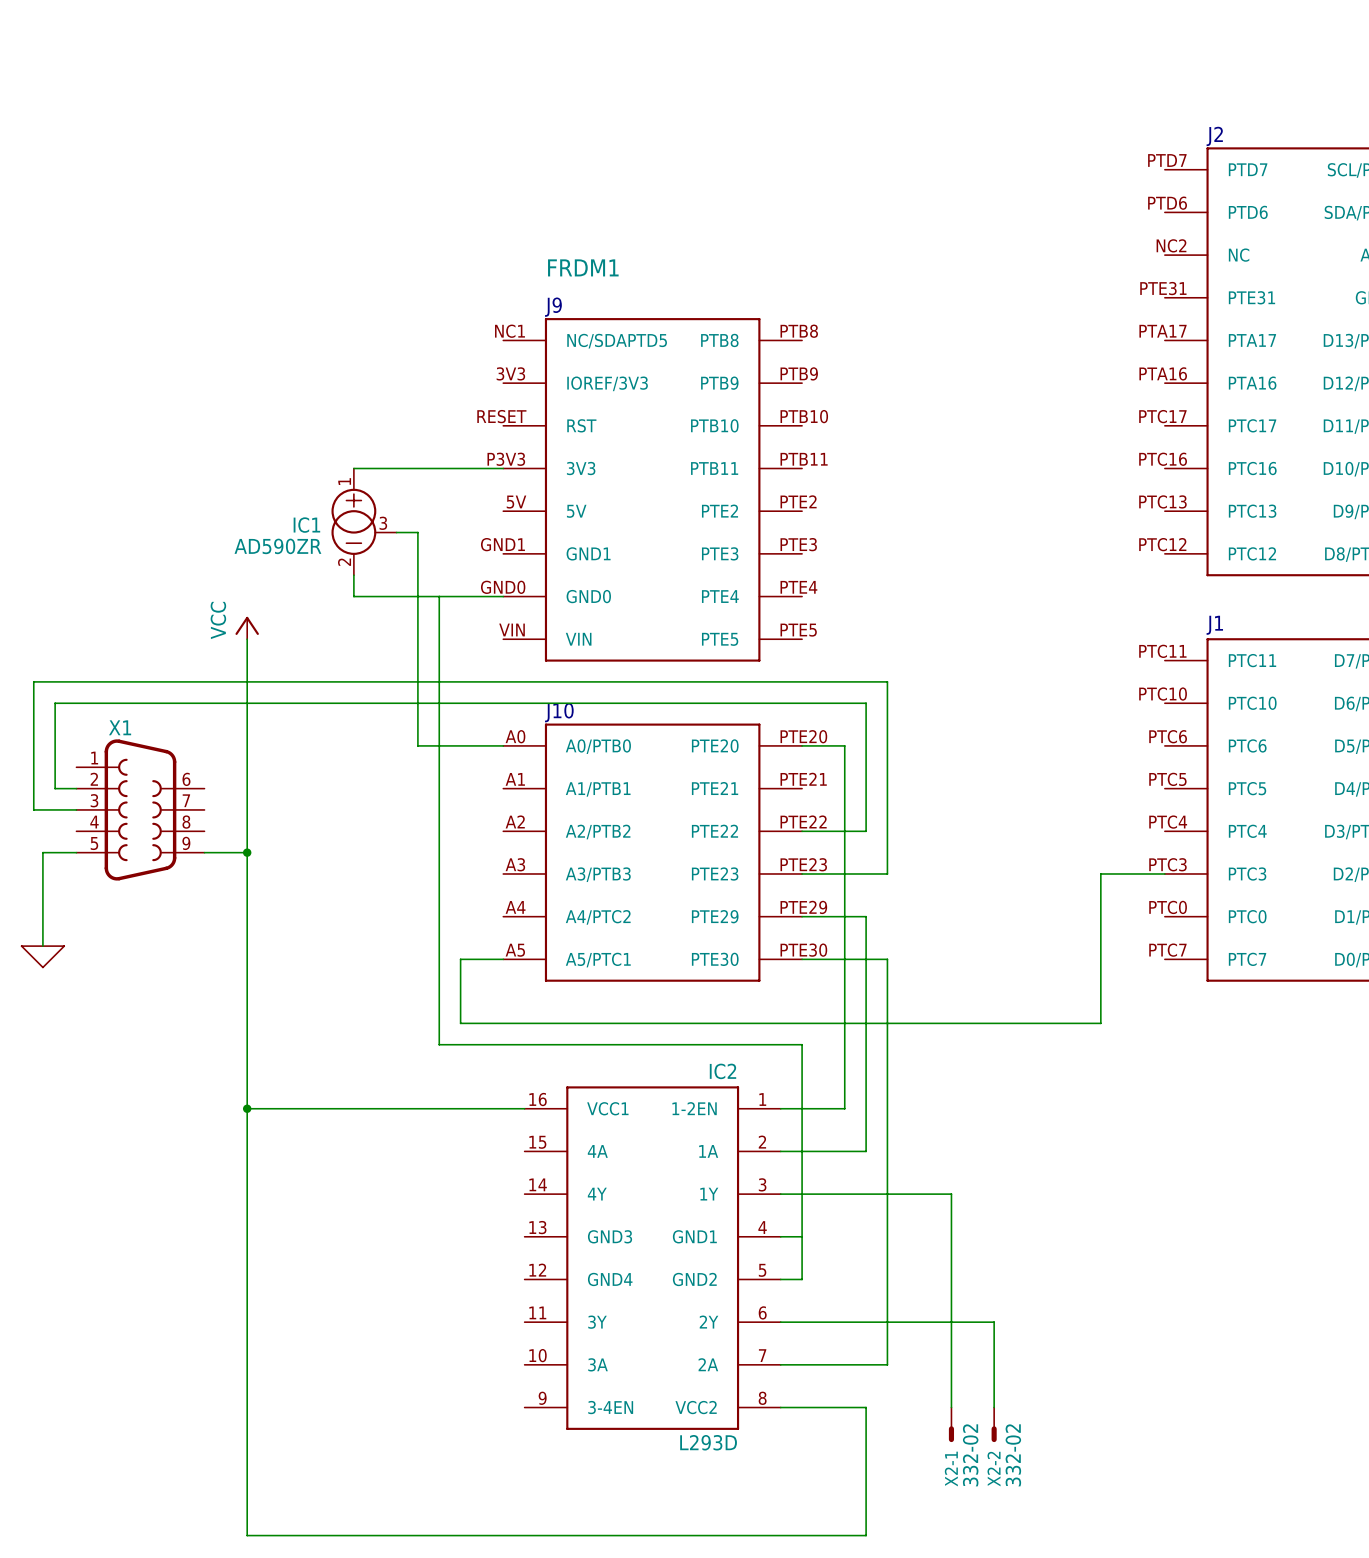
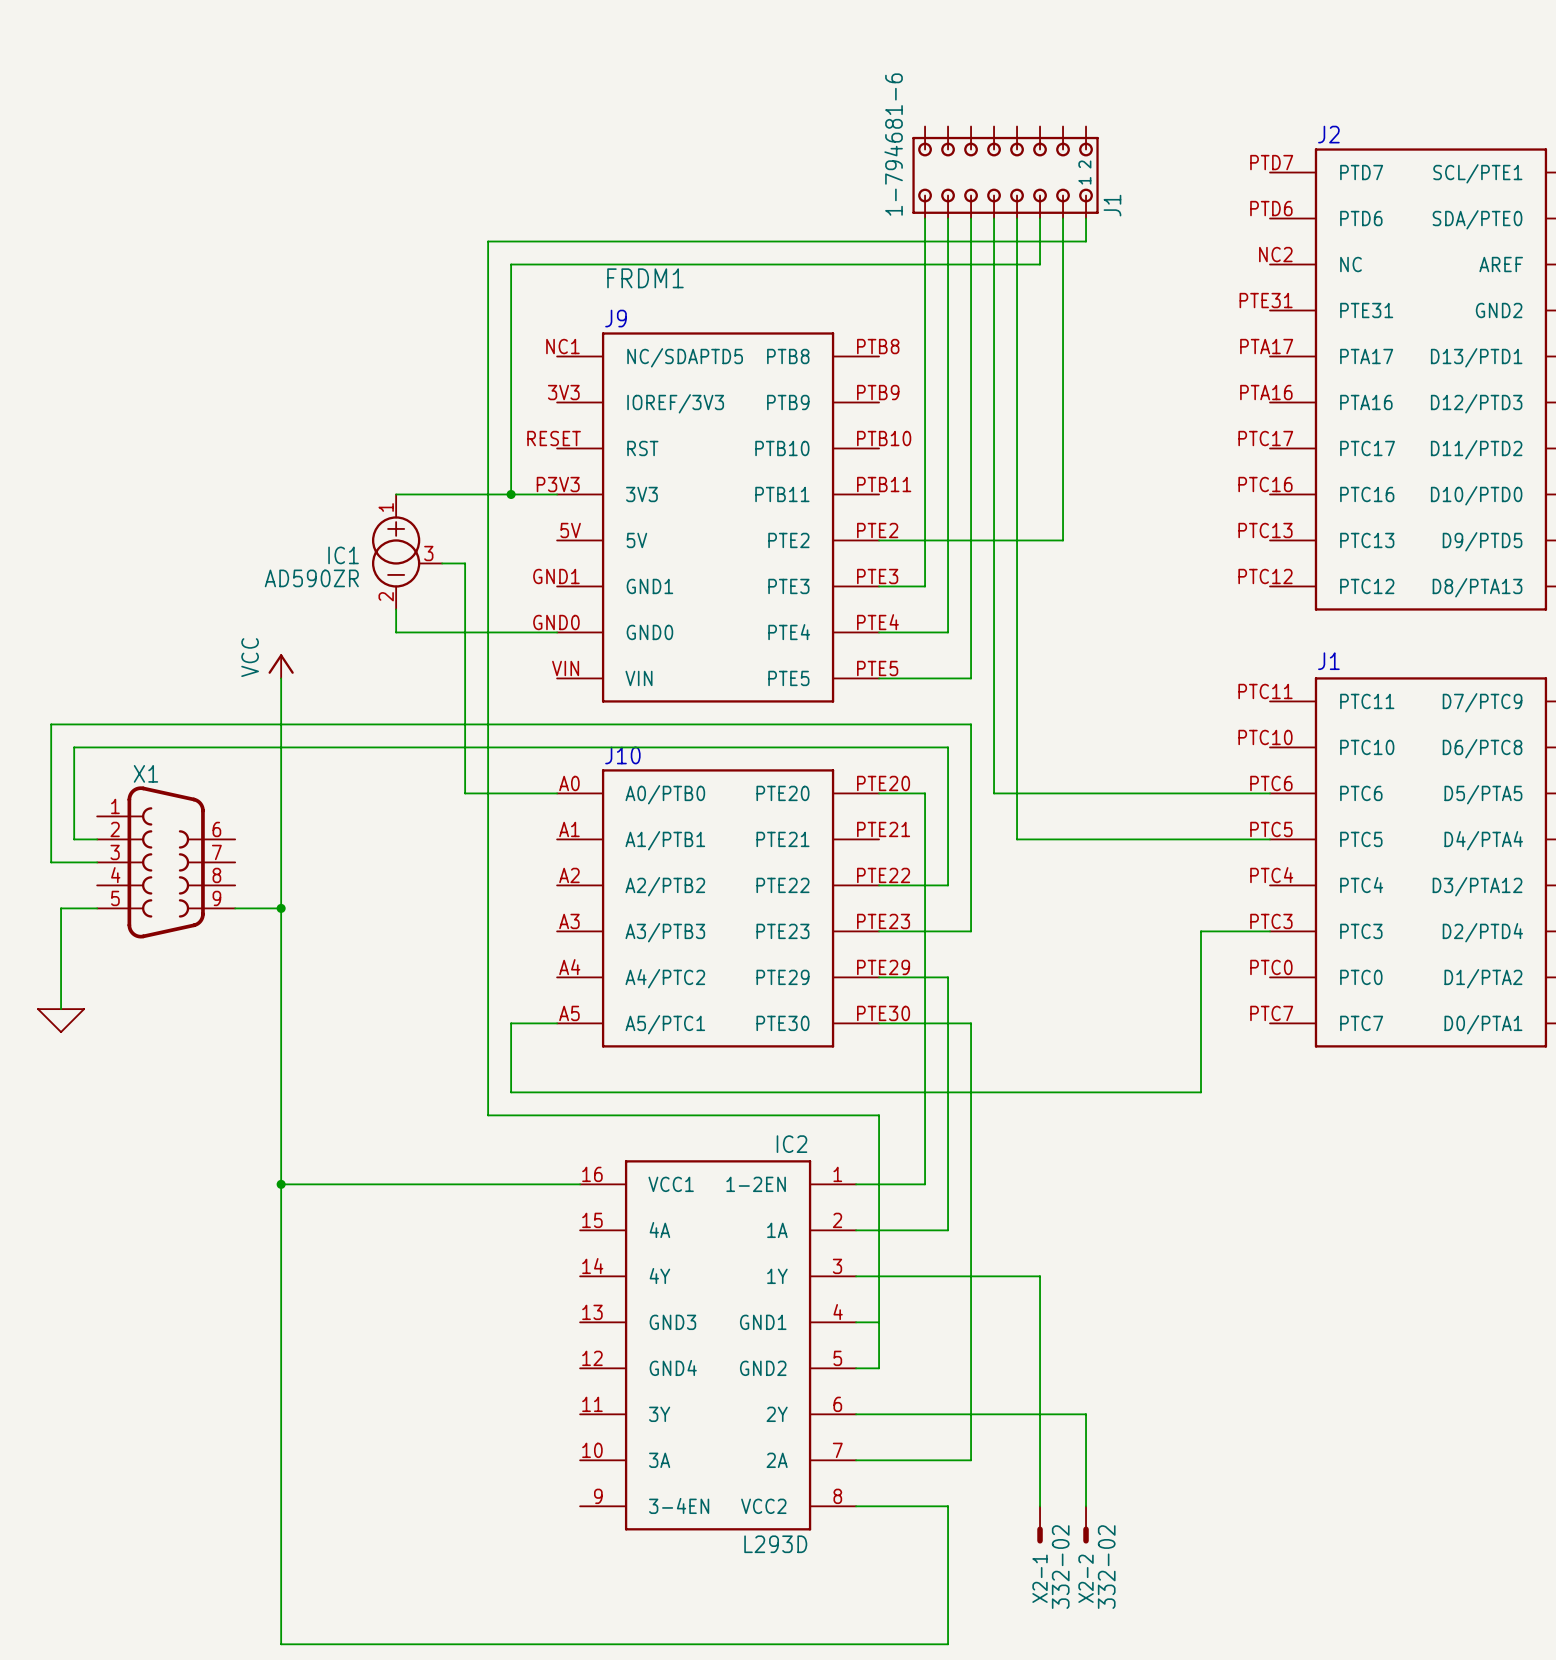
J1: none -> 1-794681-6 (1005, 172)
wire: none -> (925, 218) (925, 586) (879, 586)
wire: none -> (948, 218) (948, 632) (879, 632)
wire: none -> (971, 218) (971, 678) (879, 678)
wire: none -> (994, 218) (994, 793) (1269, 793)
wire: none -> (1017, 218) (1017, 839) (1269, 839)
wire: none -> (1040, 218) (1040, 264) (511, 264) (511, 494)
wire: none -> (1063, 218) (1063, 540) (879, 540)
wire: none -> (1086, 218) (1086, 241) (488, 241) (488, 632)
junction: none -> (511, 494)

